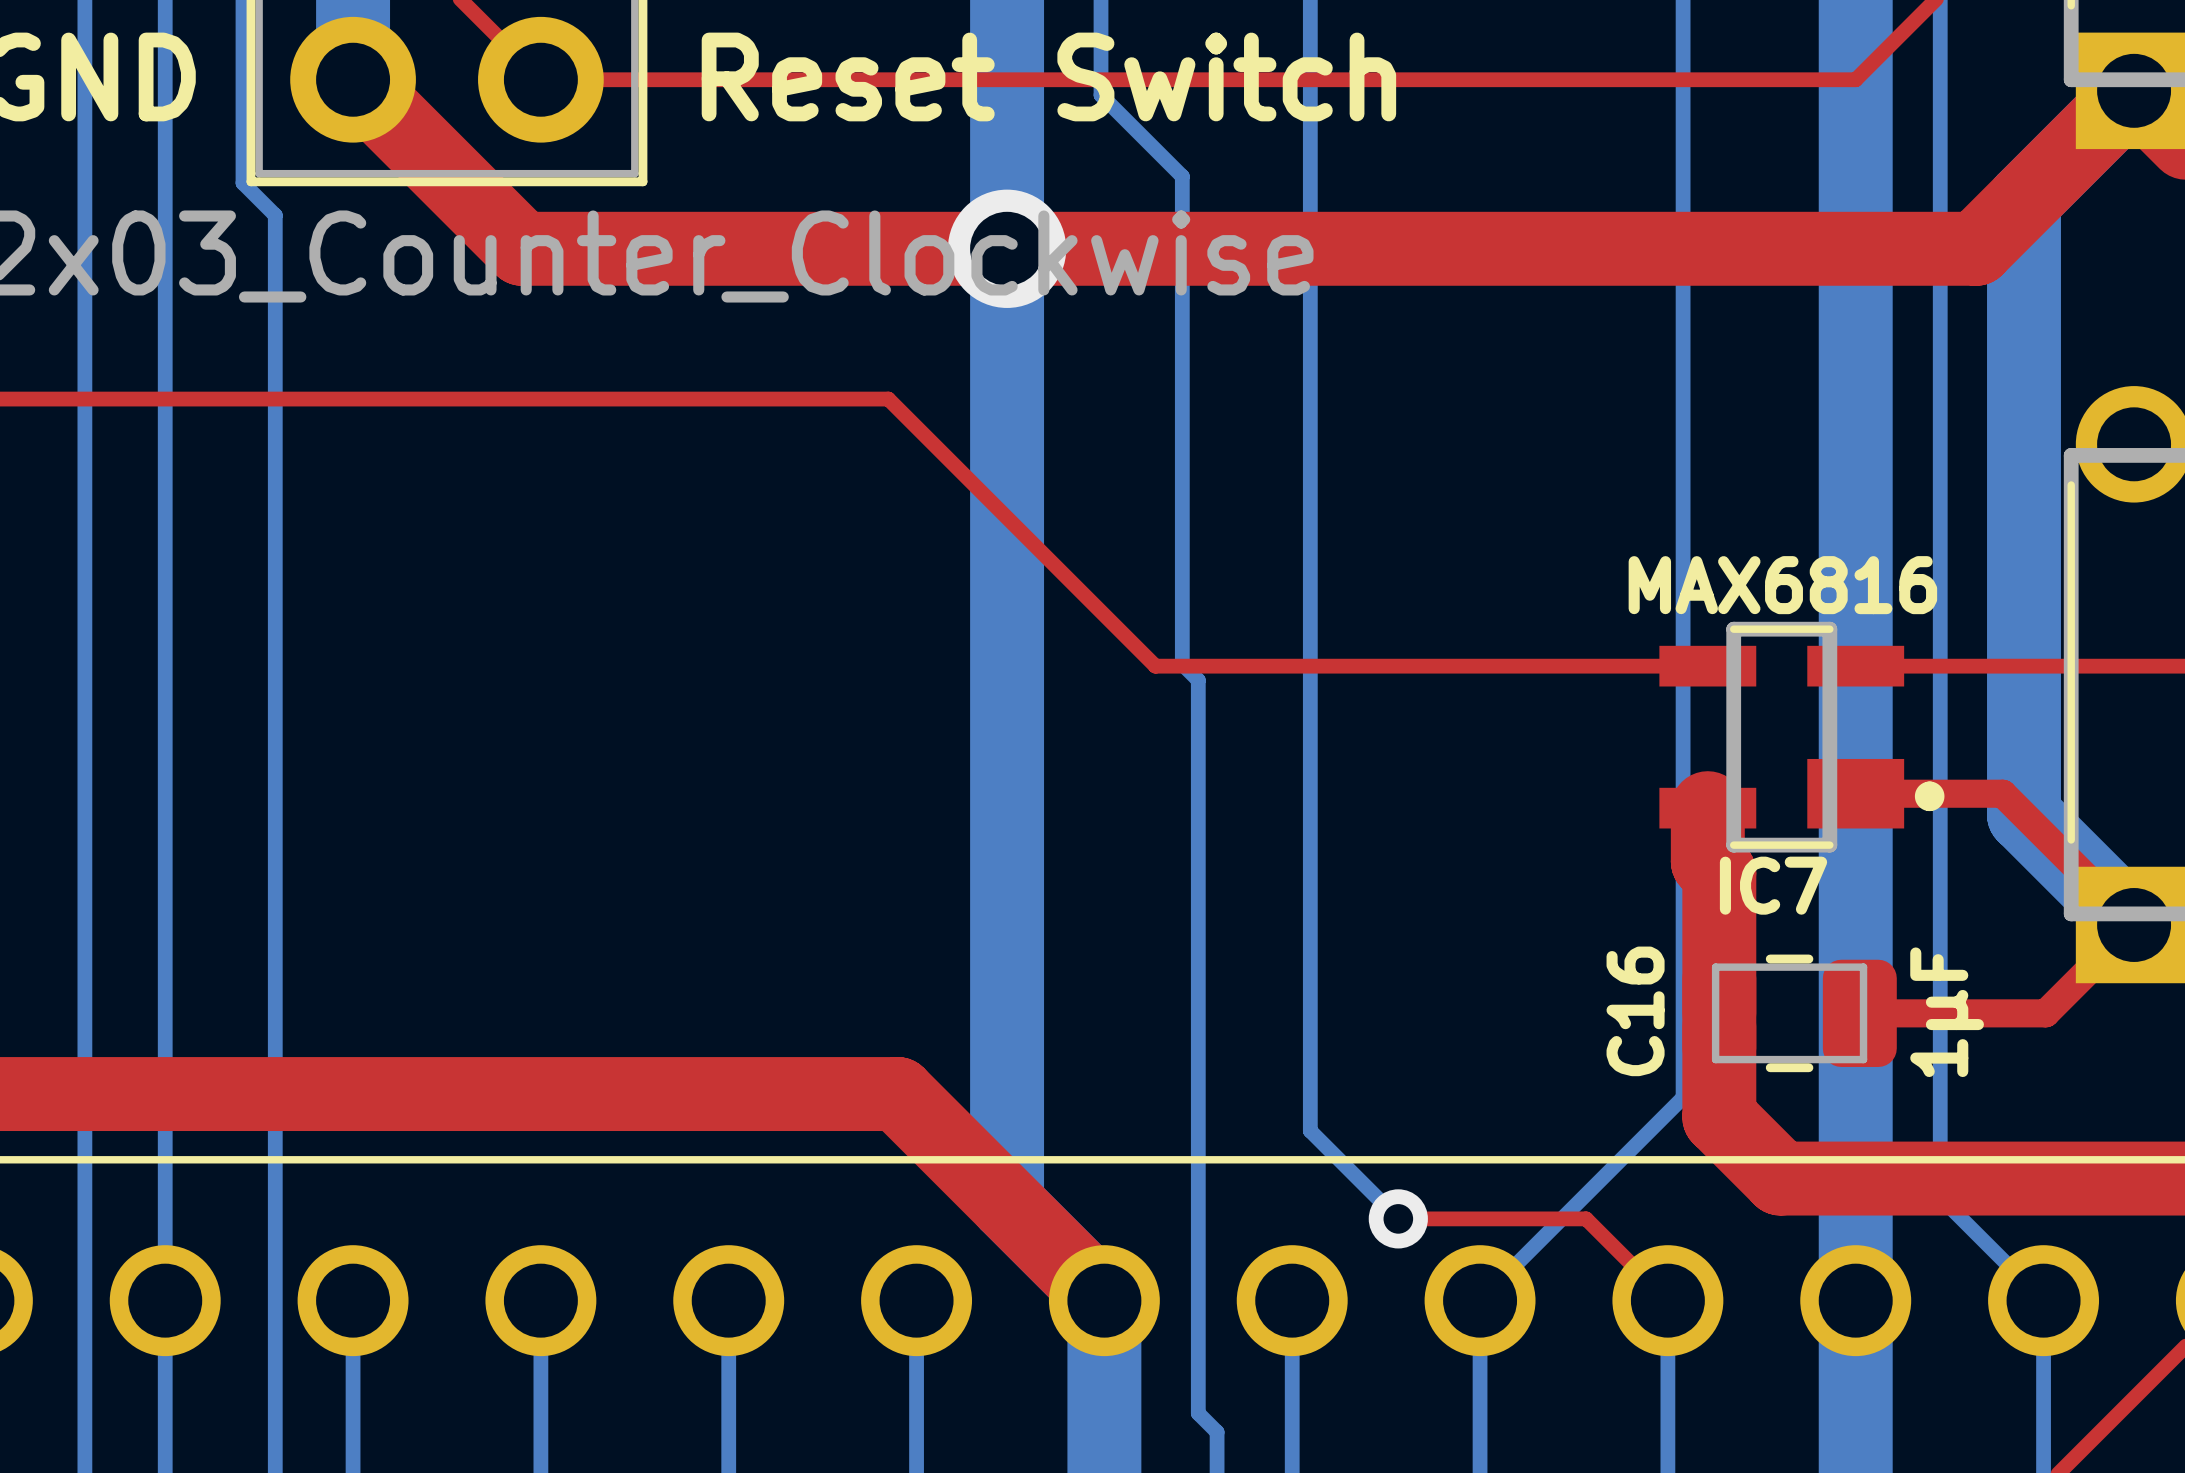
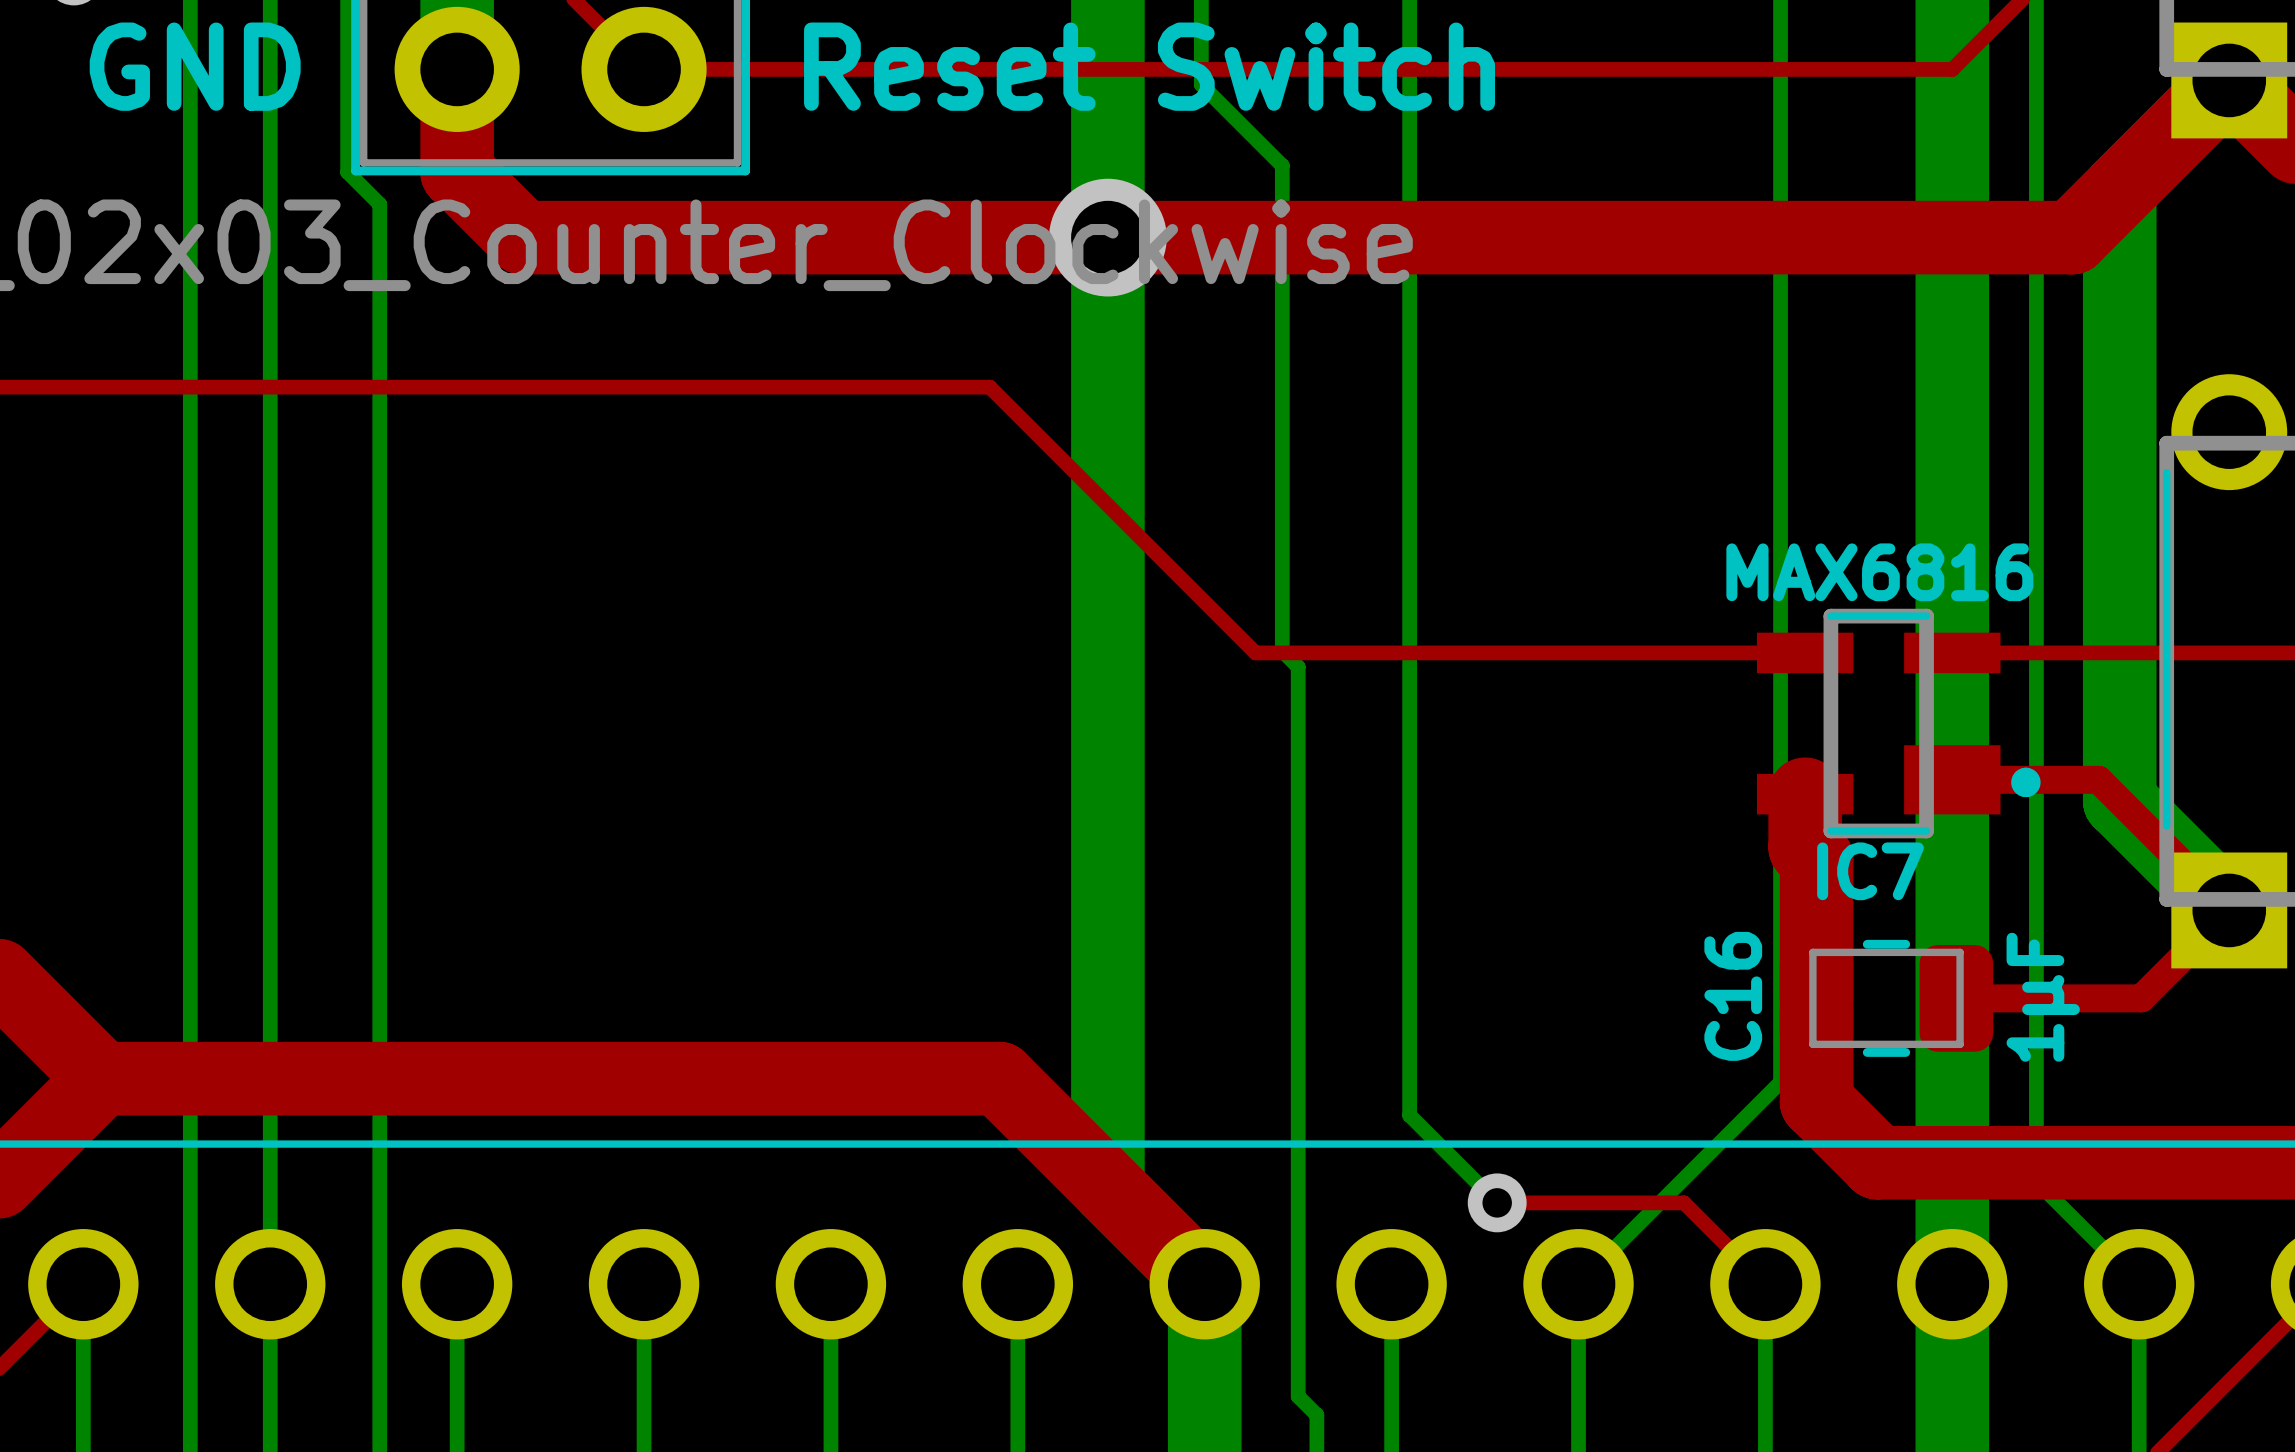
top track: (353, 79) (522, 248) -> (457, 69) (457, 172) (522, 237) (625, 237)

